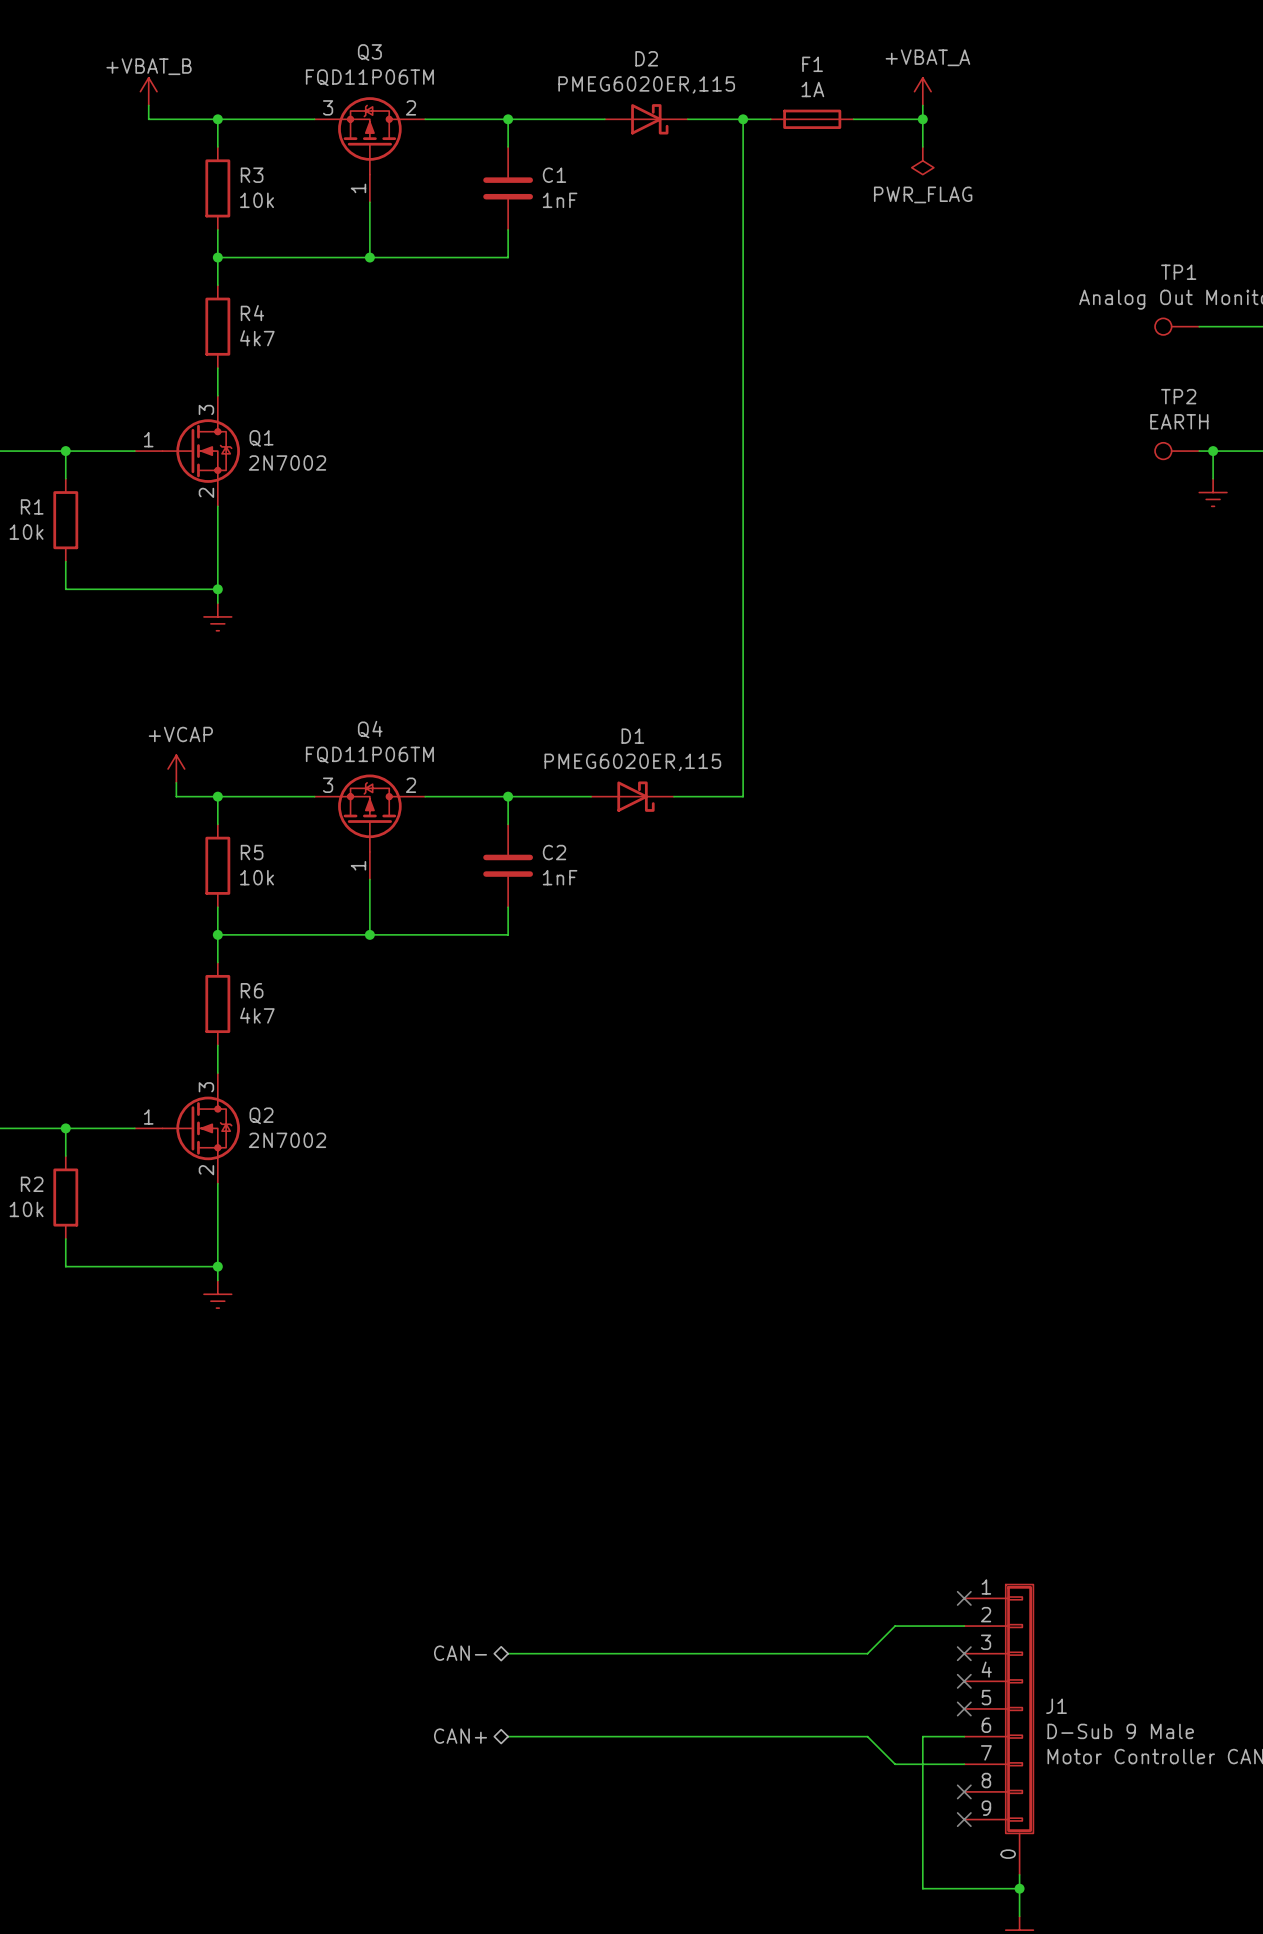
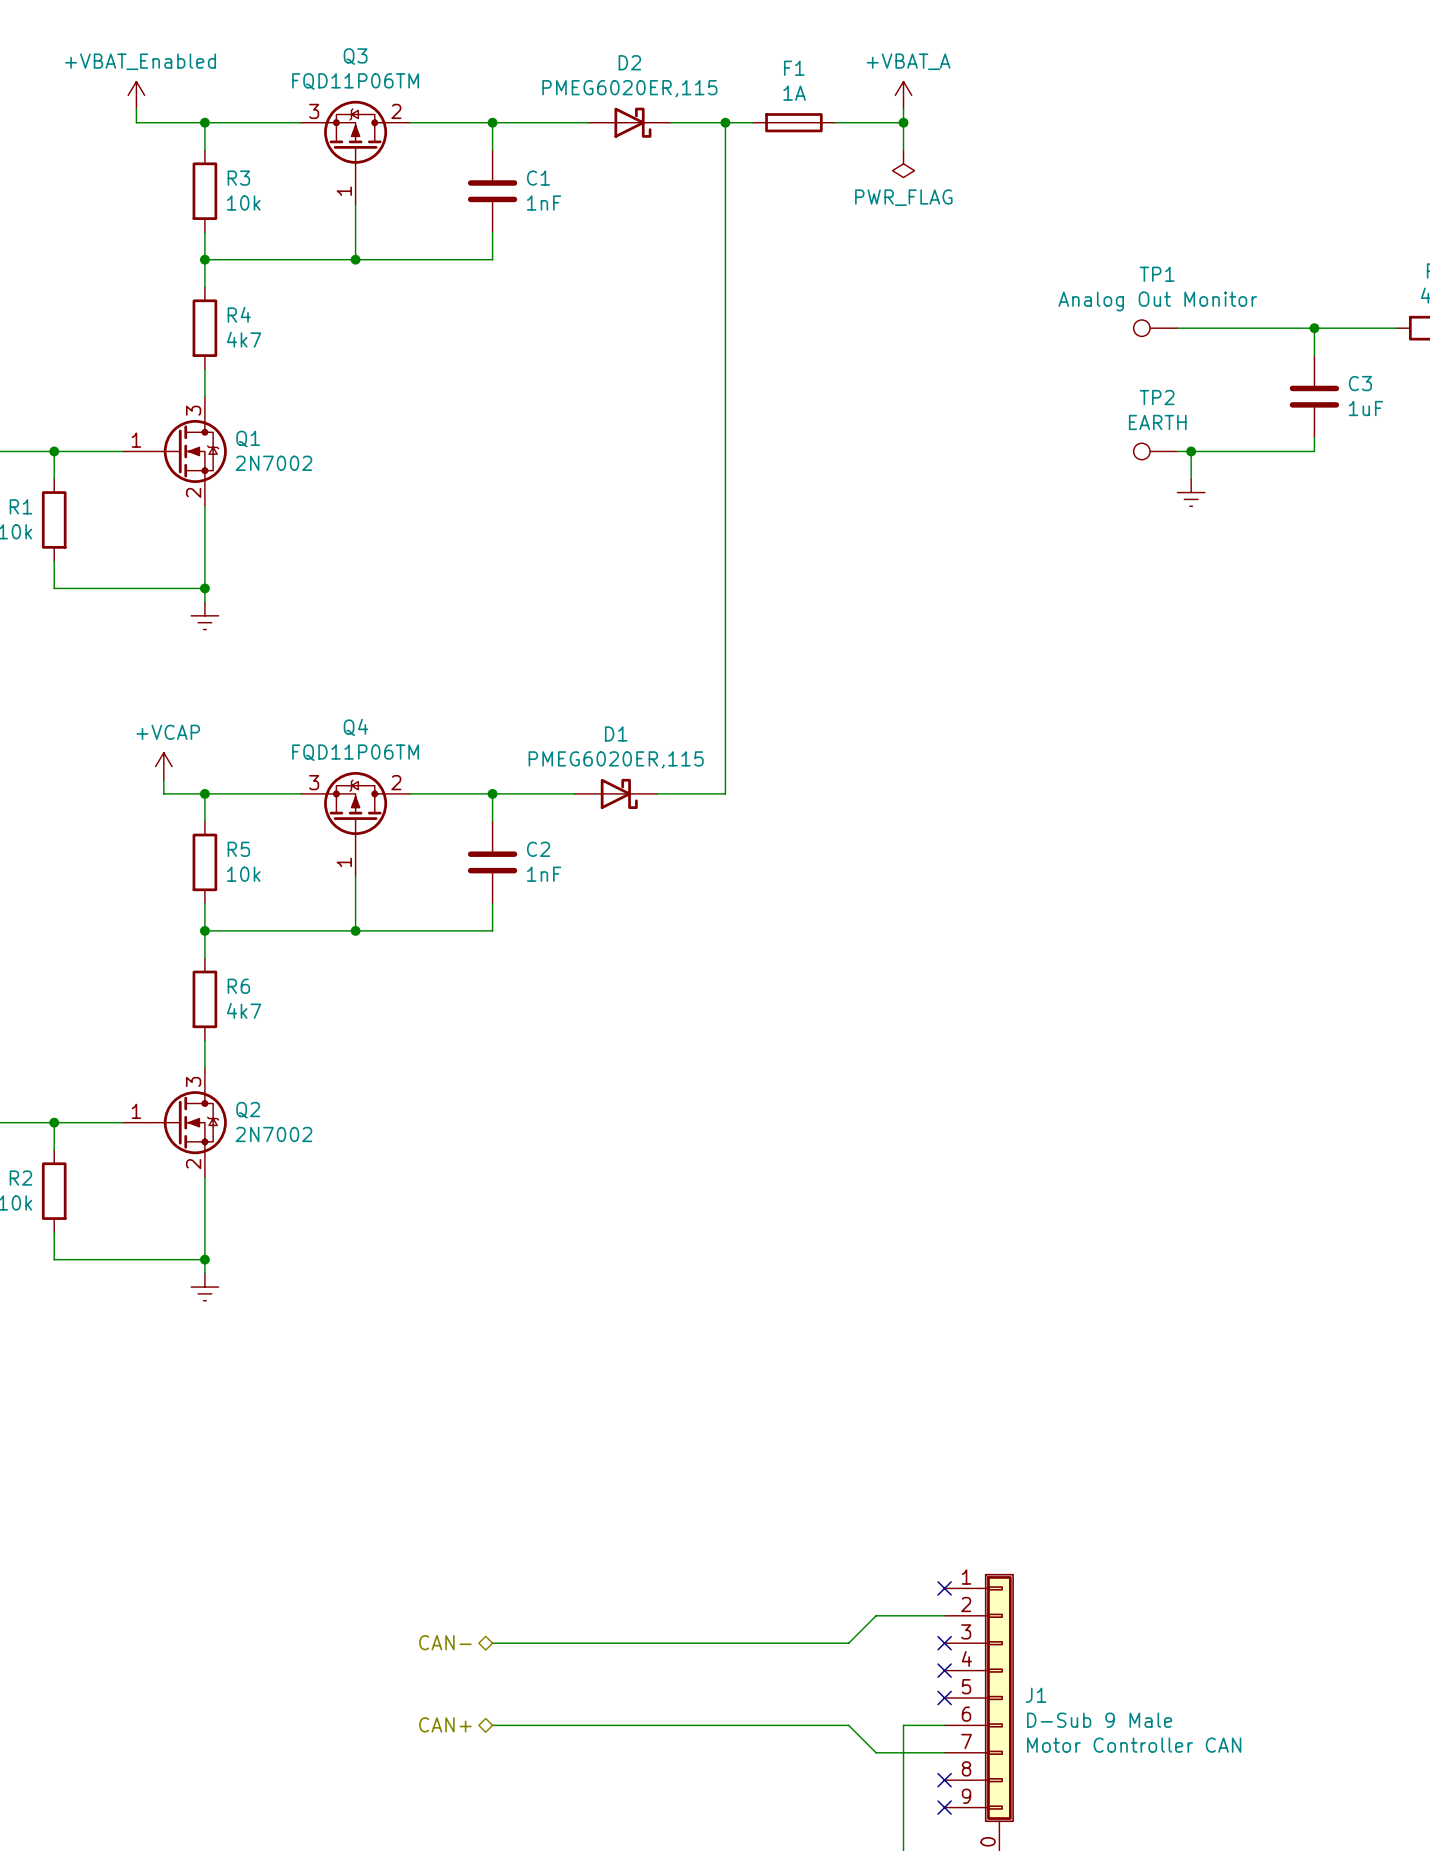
power symbol: +VBAT_B (148, 91) -> +VBAT_Enabled (136, 95)

